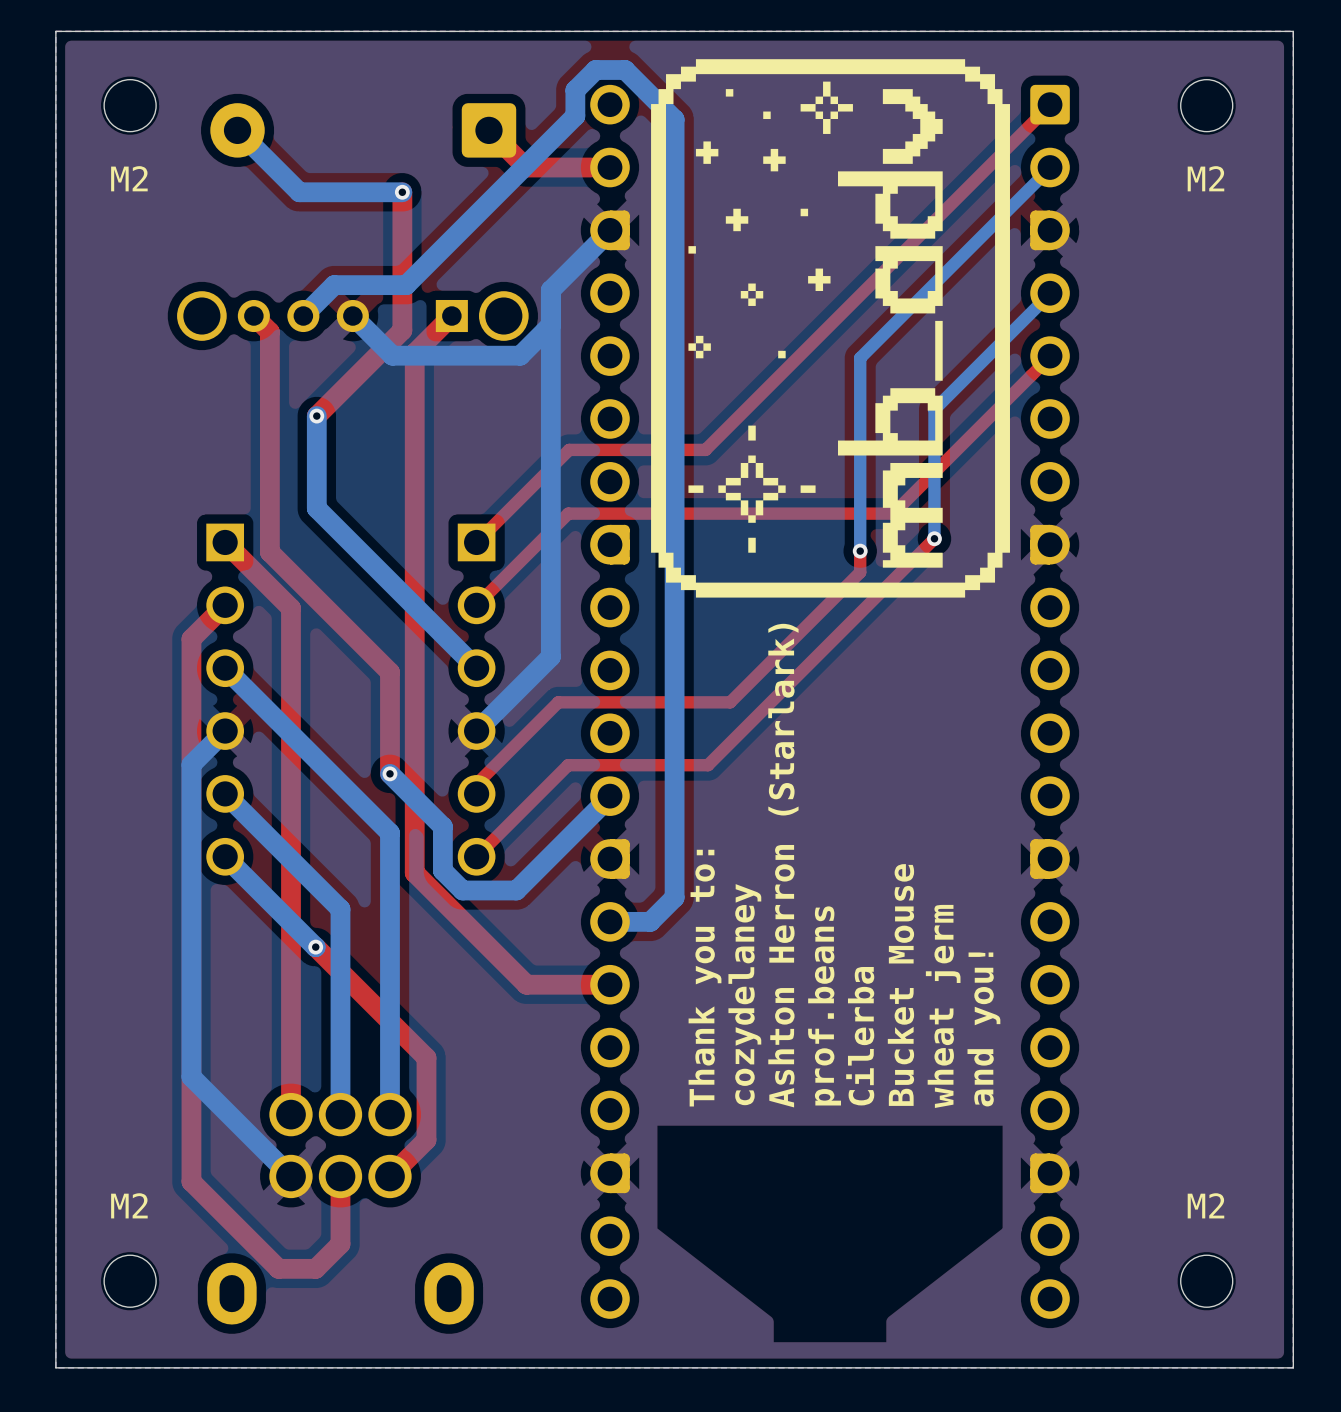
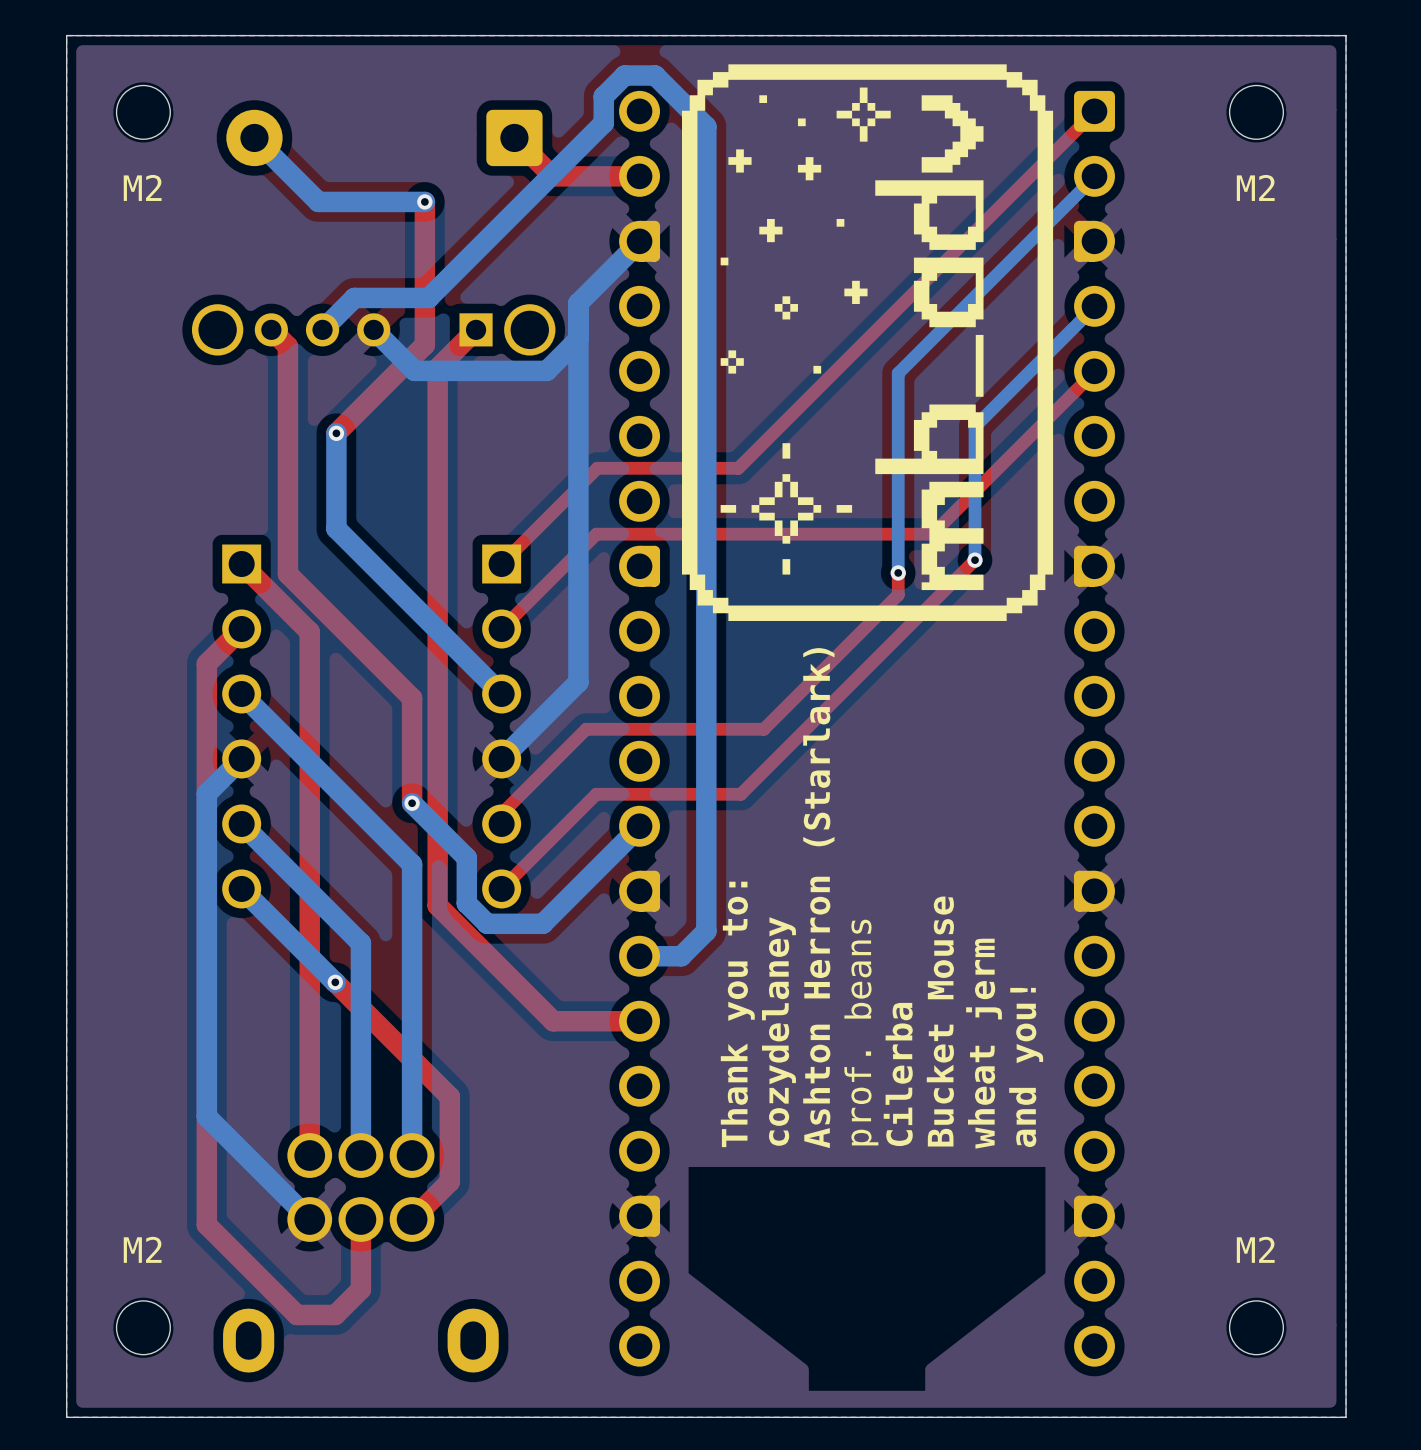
text: prof.beans (824, 1005) -> prof. beans (861, 1032)

